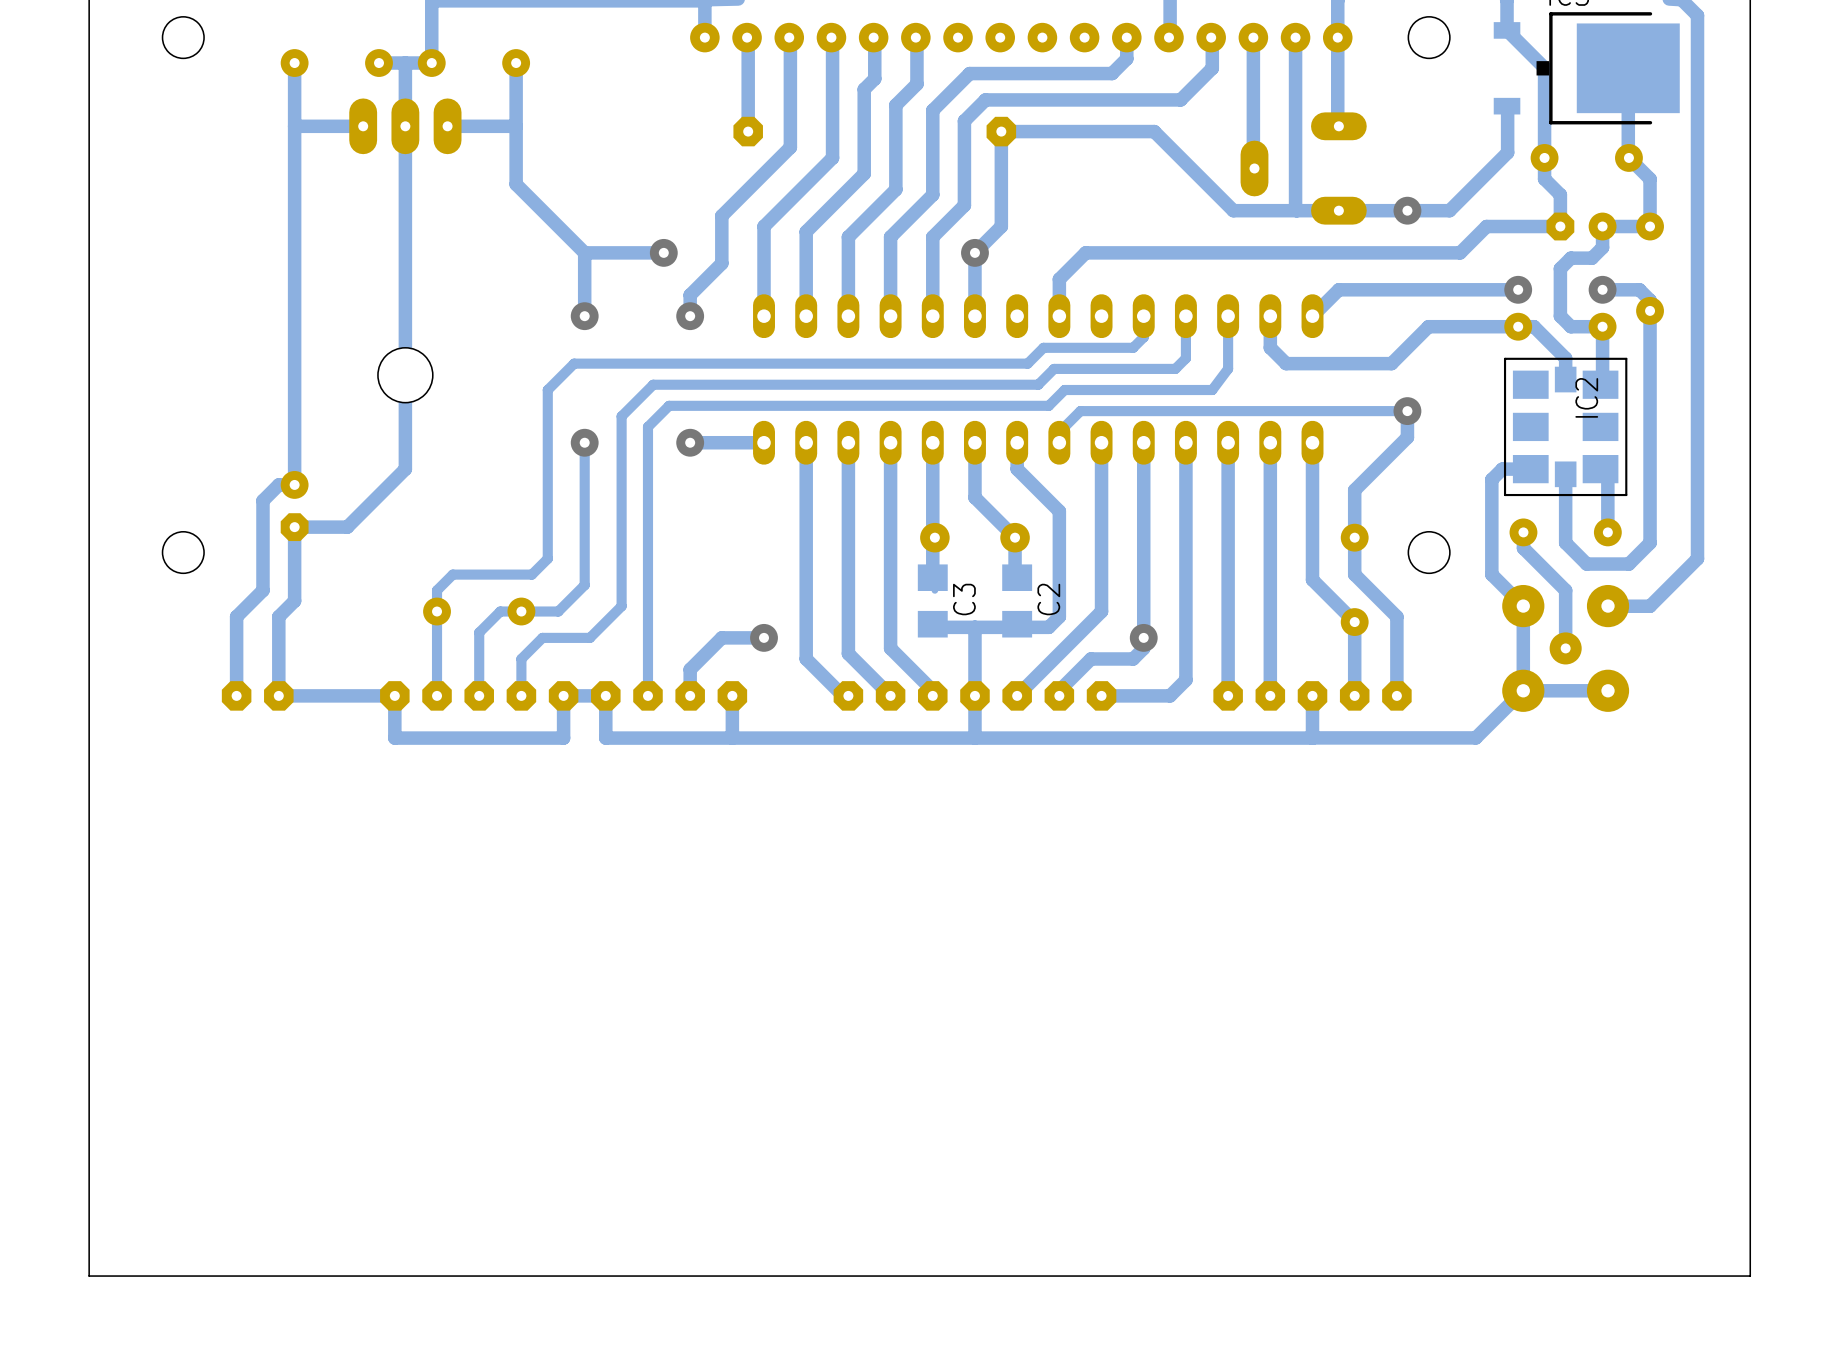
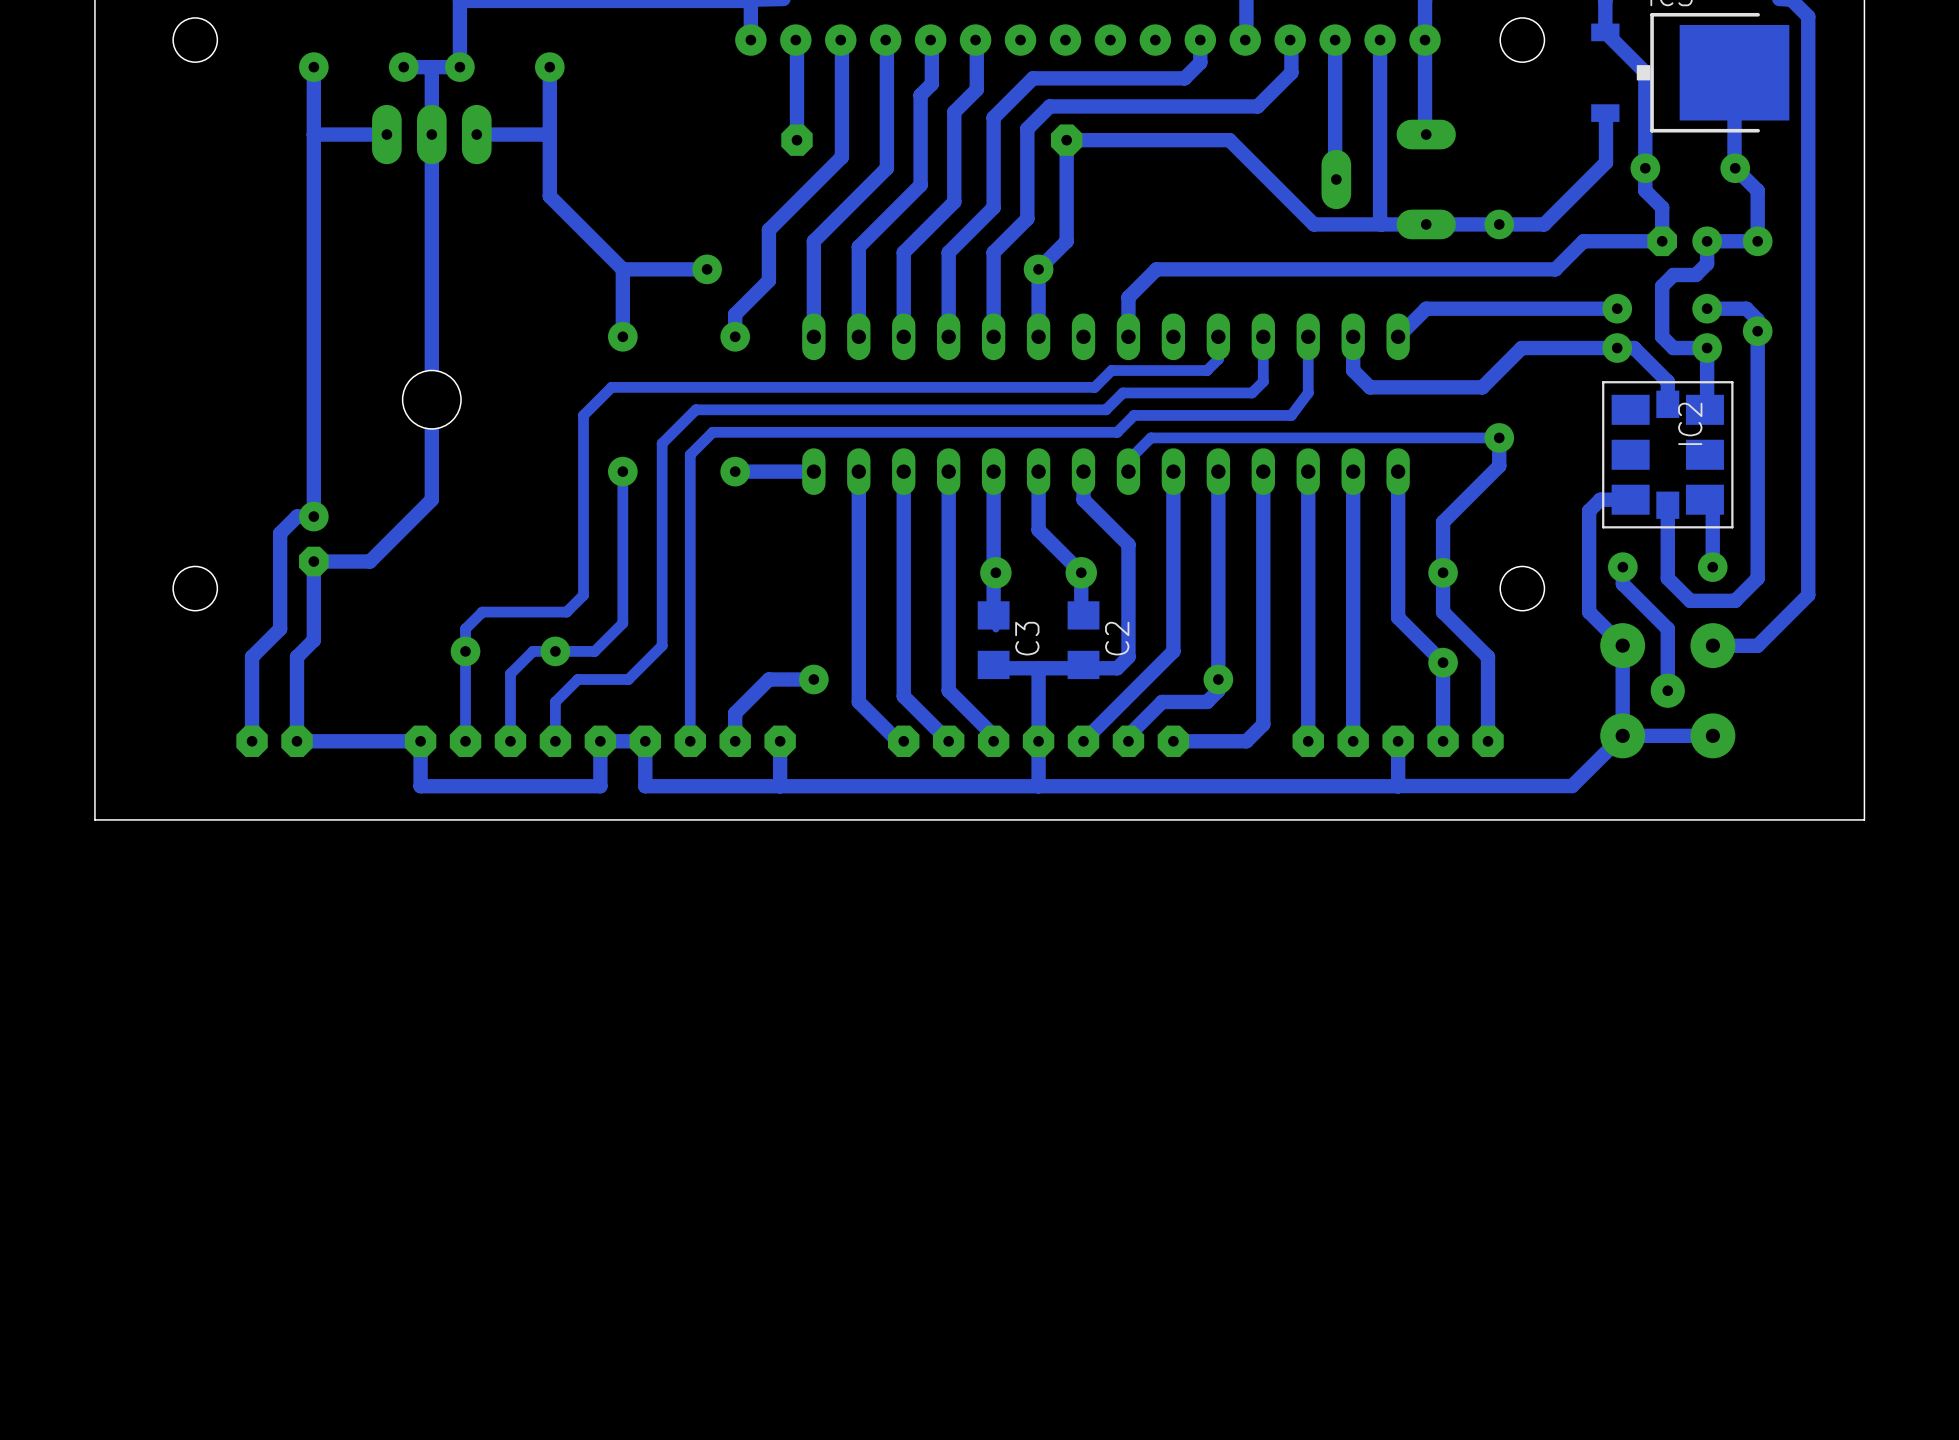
board edge: (1750, 769) (1750, 1276) (89, 1276) (89, 769) -> (1864, 819) (94, 819)

